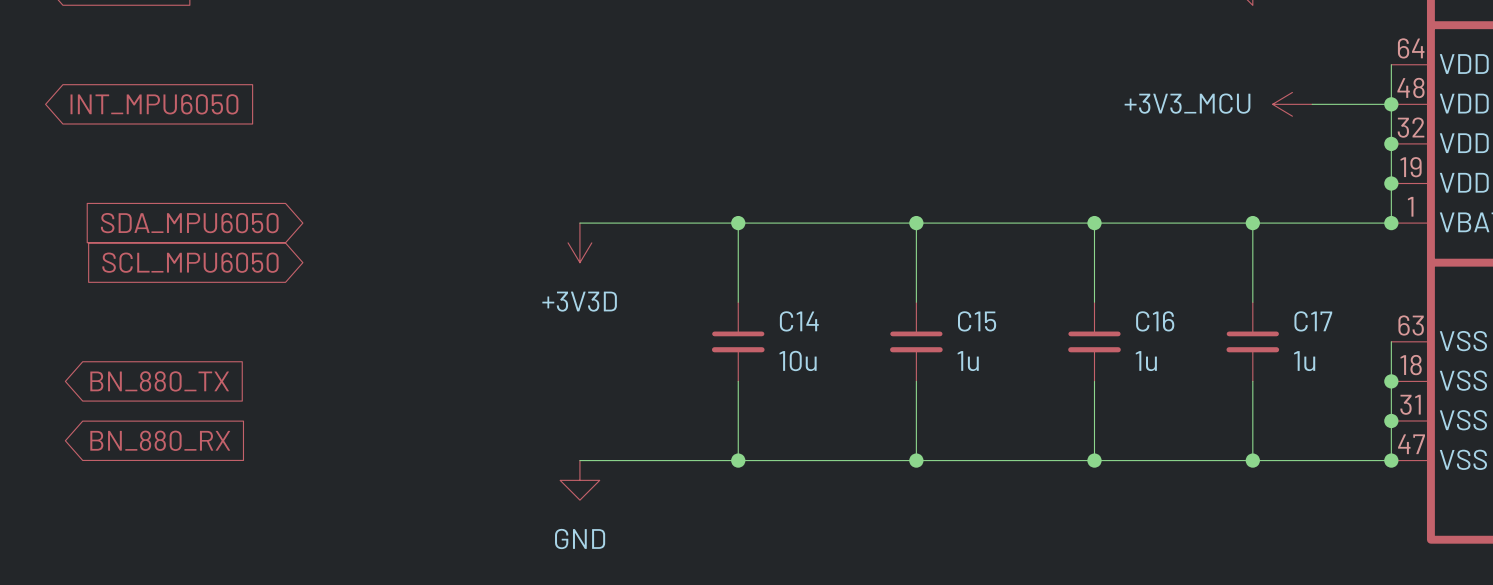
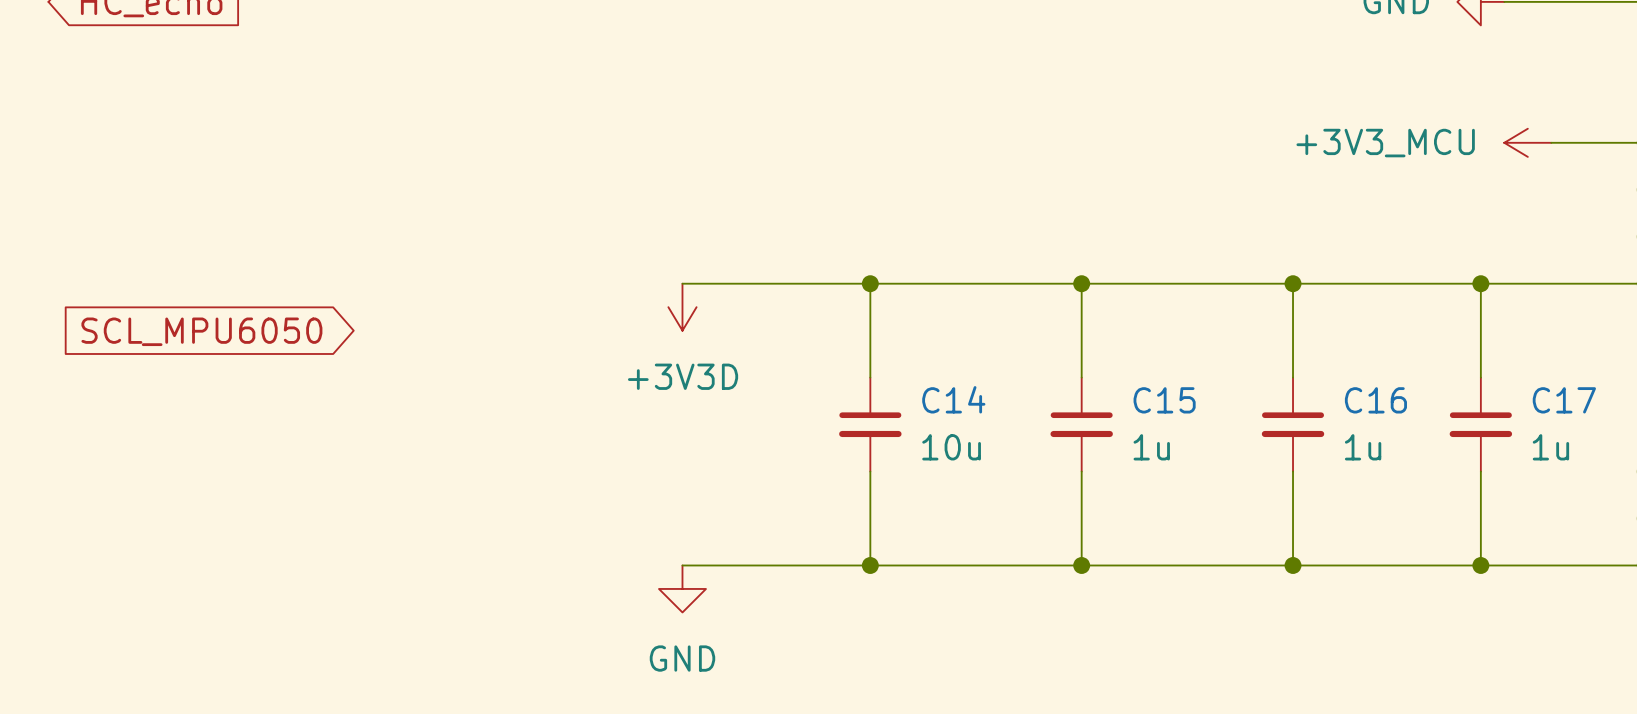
global label: INT_MPU6050 (154, 104) -> none
global label: SDA_MPU6050 (189, 223) -> none
global label: BN_880_TX (159, 381) -> none
global label: BN_880_RX (160, 440) -> none

